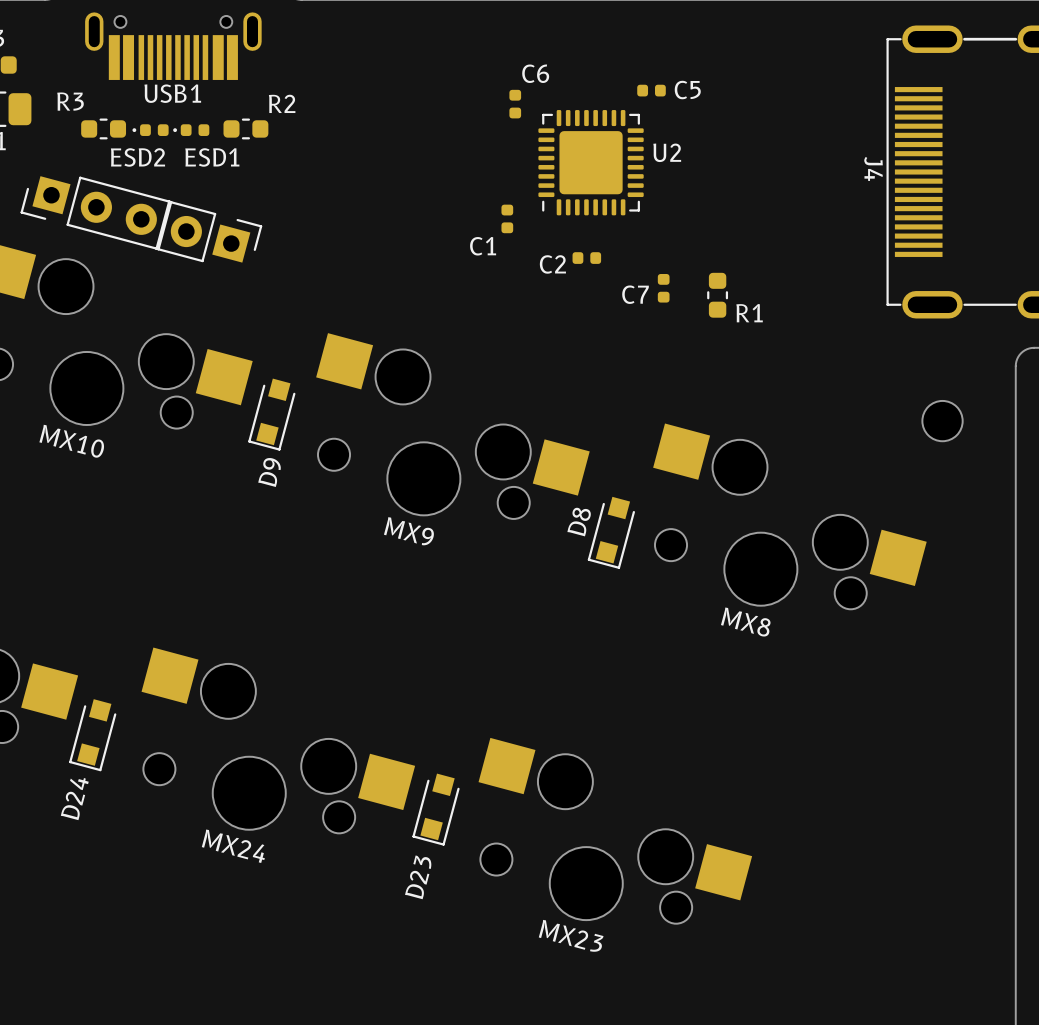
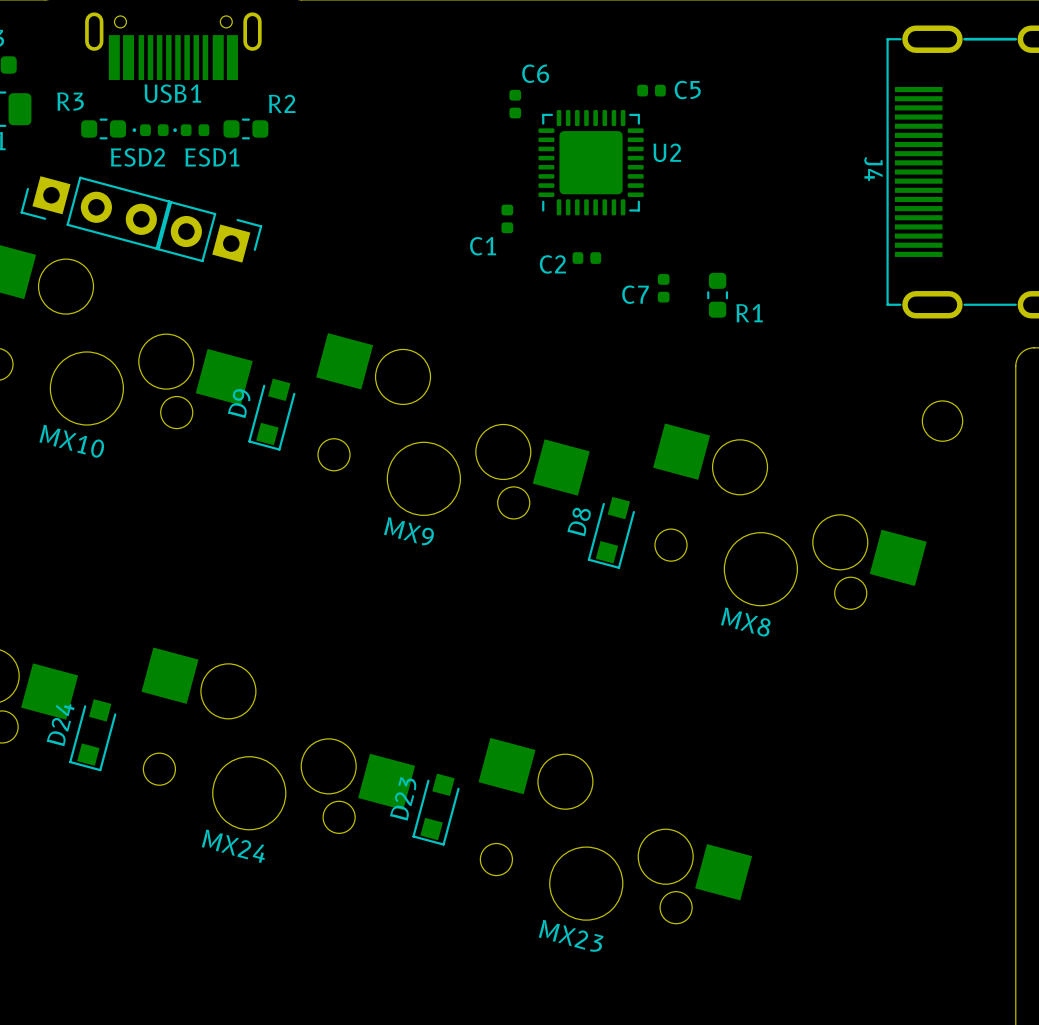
D9 name position: D9 (269, 472) -> D9 (239, 403)
D24 name position: D24 (74, 799) -> D24 (60, 725)
D23 name position: D23 (418, 877) -> D23 (403, 798)

